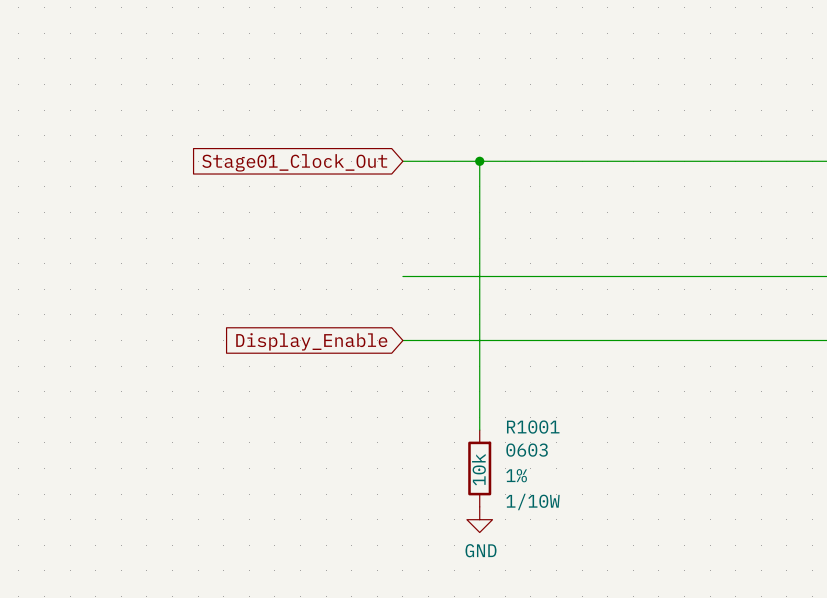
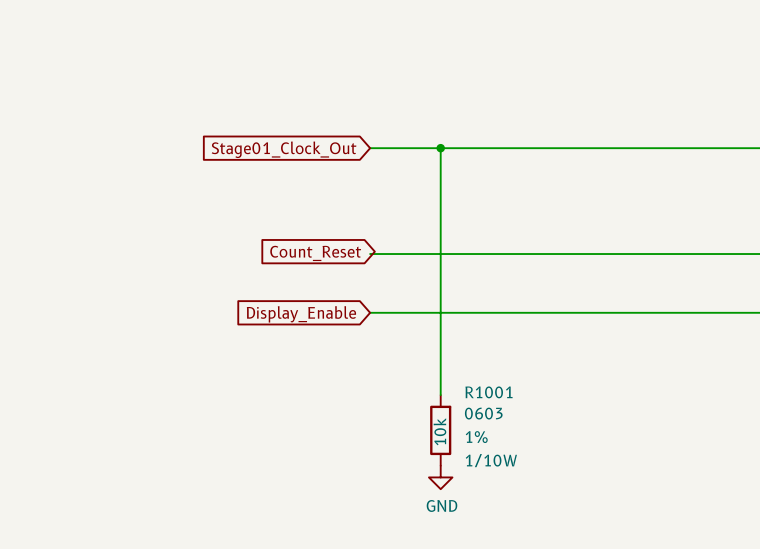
global label: none -> Count_Reset (315, 253)

